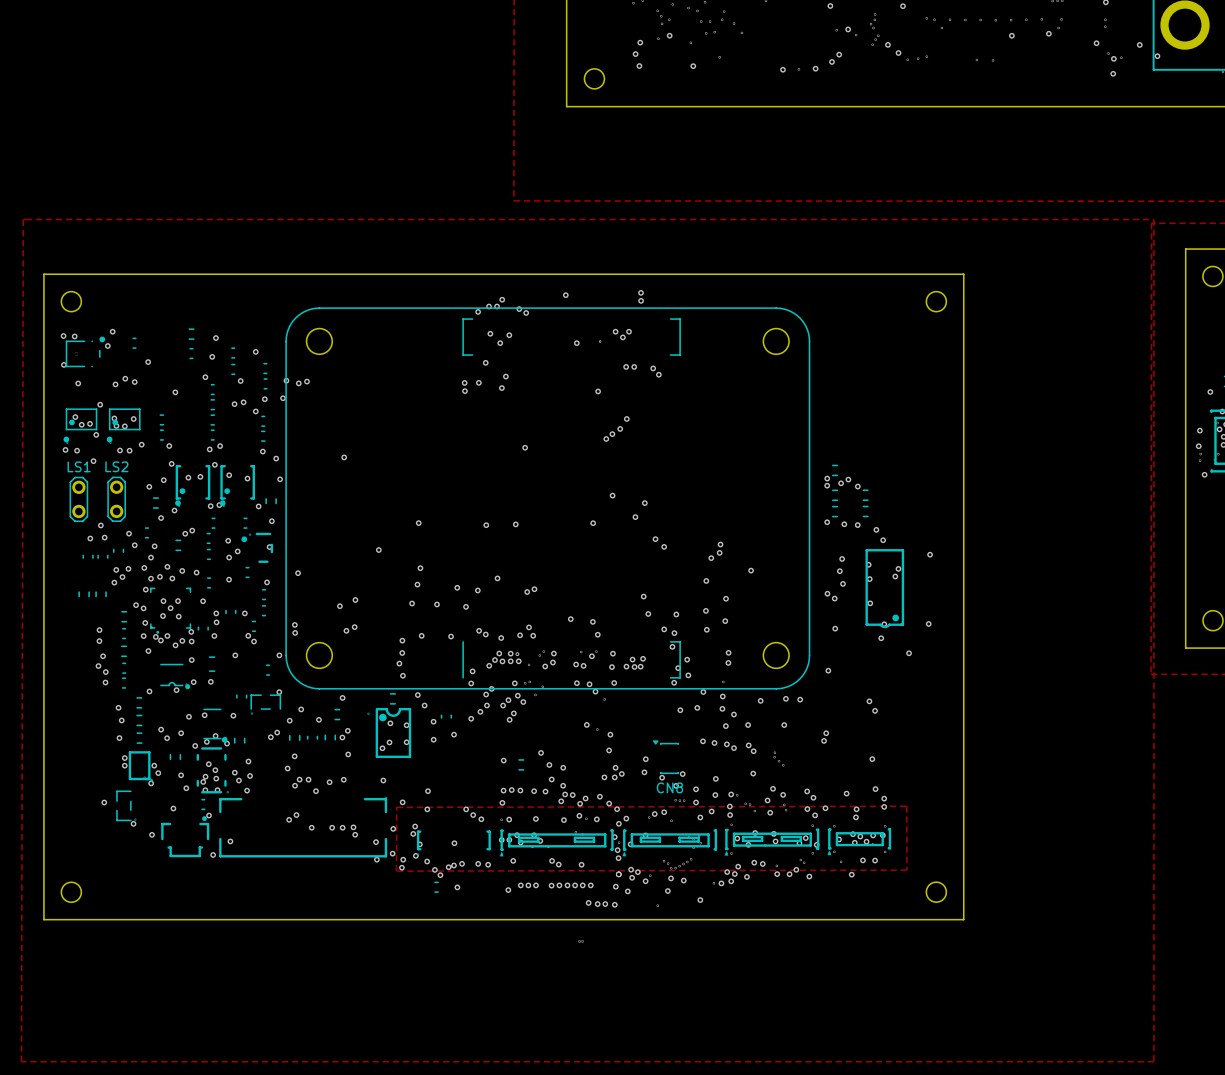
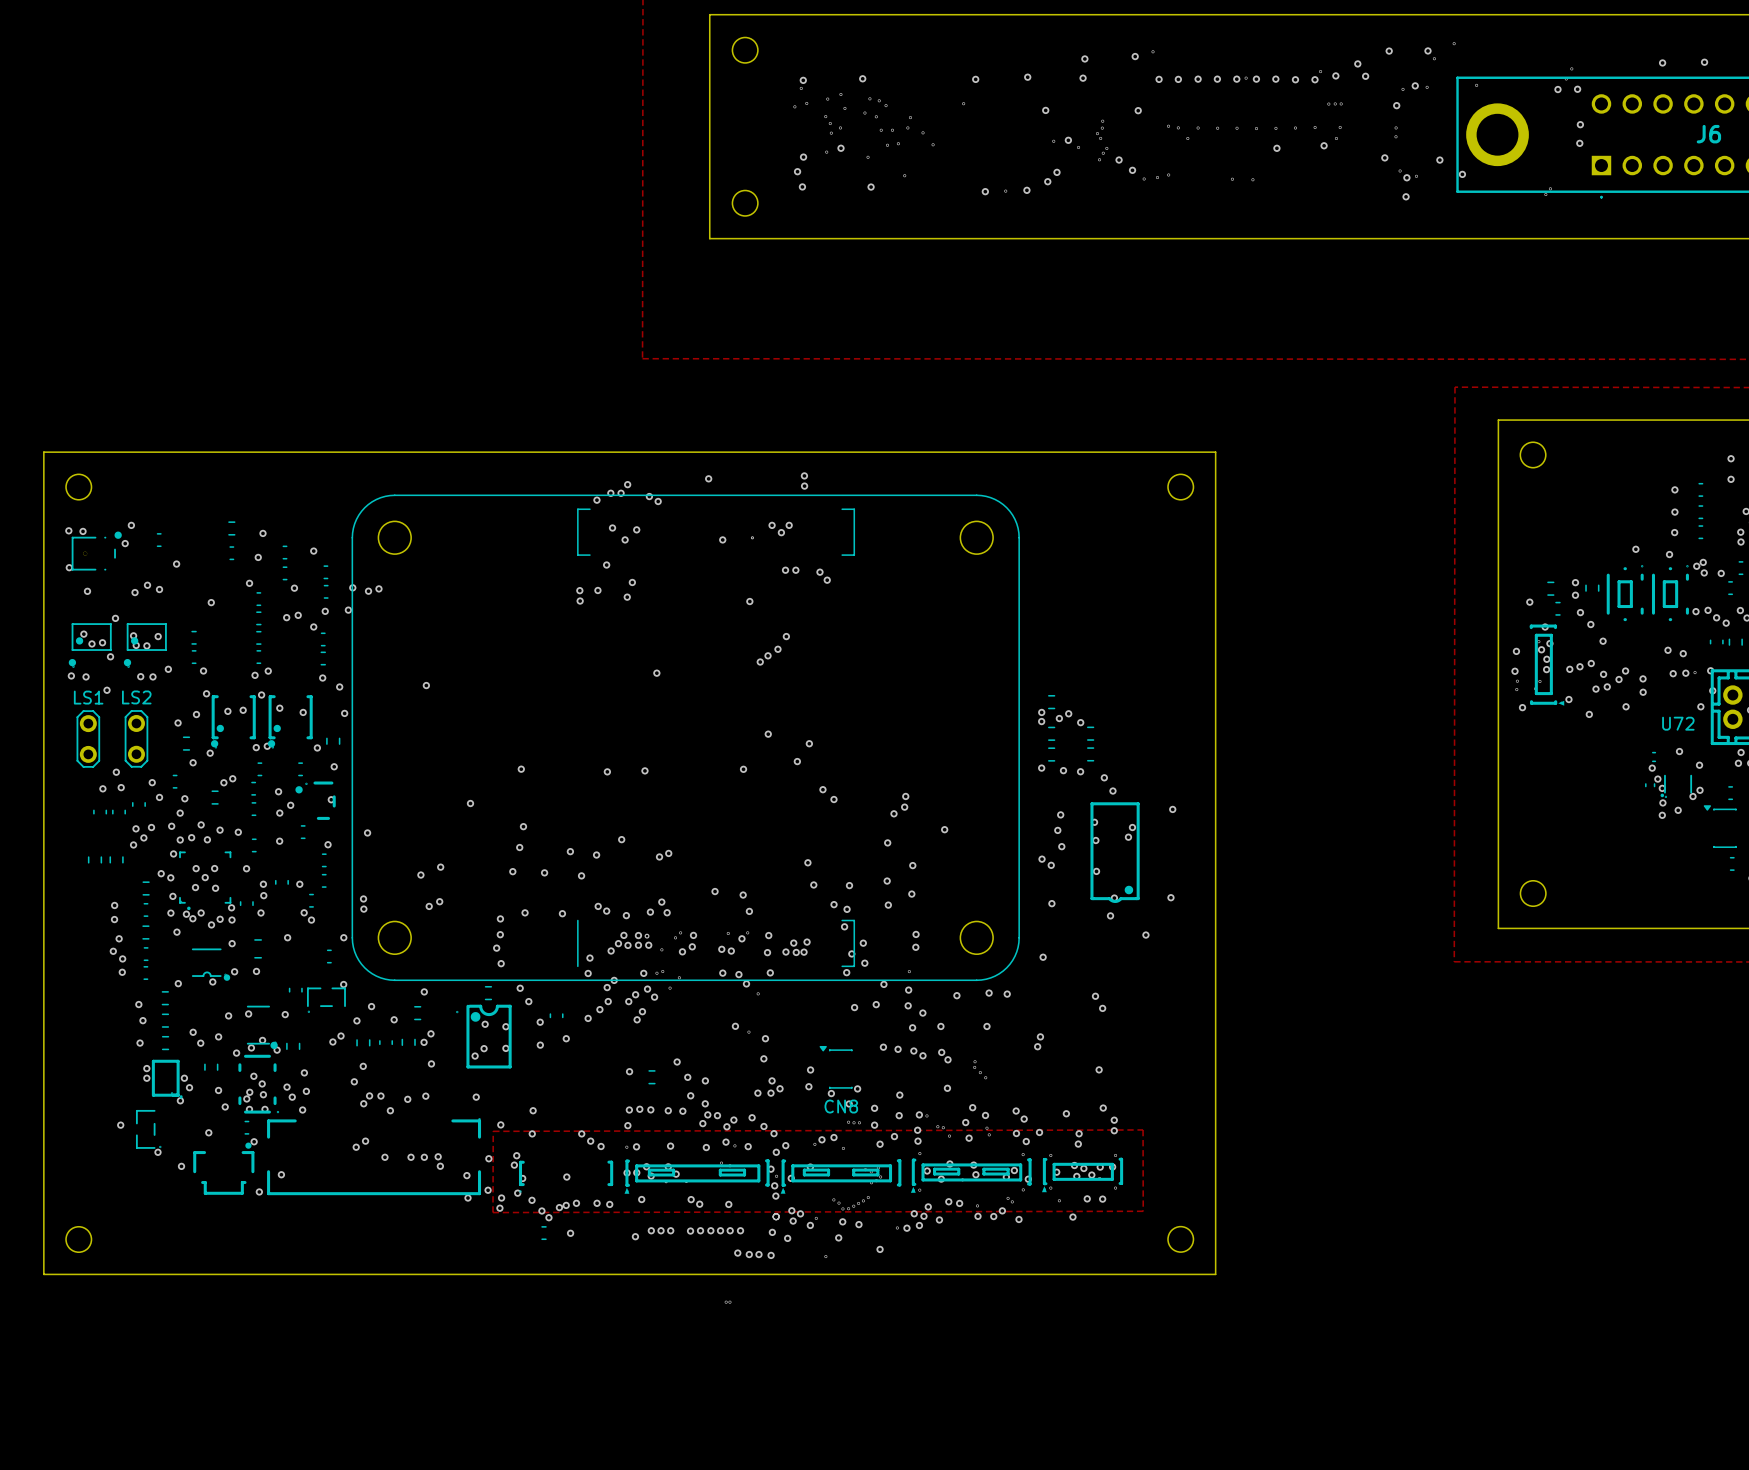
zone outline: (23, 219) (21, 1061) (1153, 1061) (1153, 219) (23, 219) -> none

